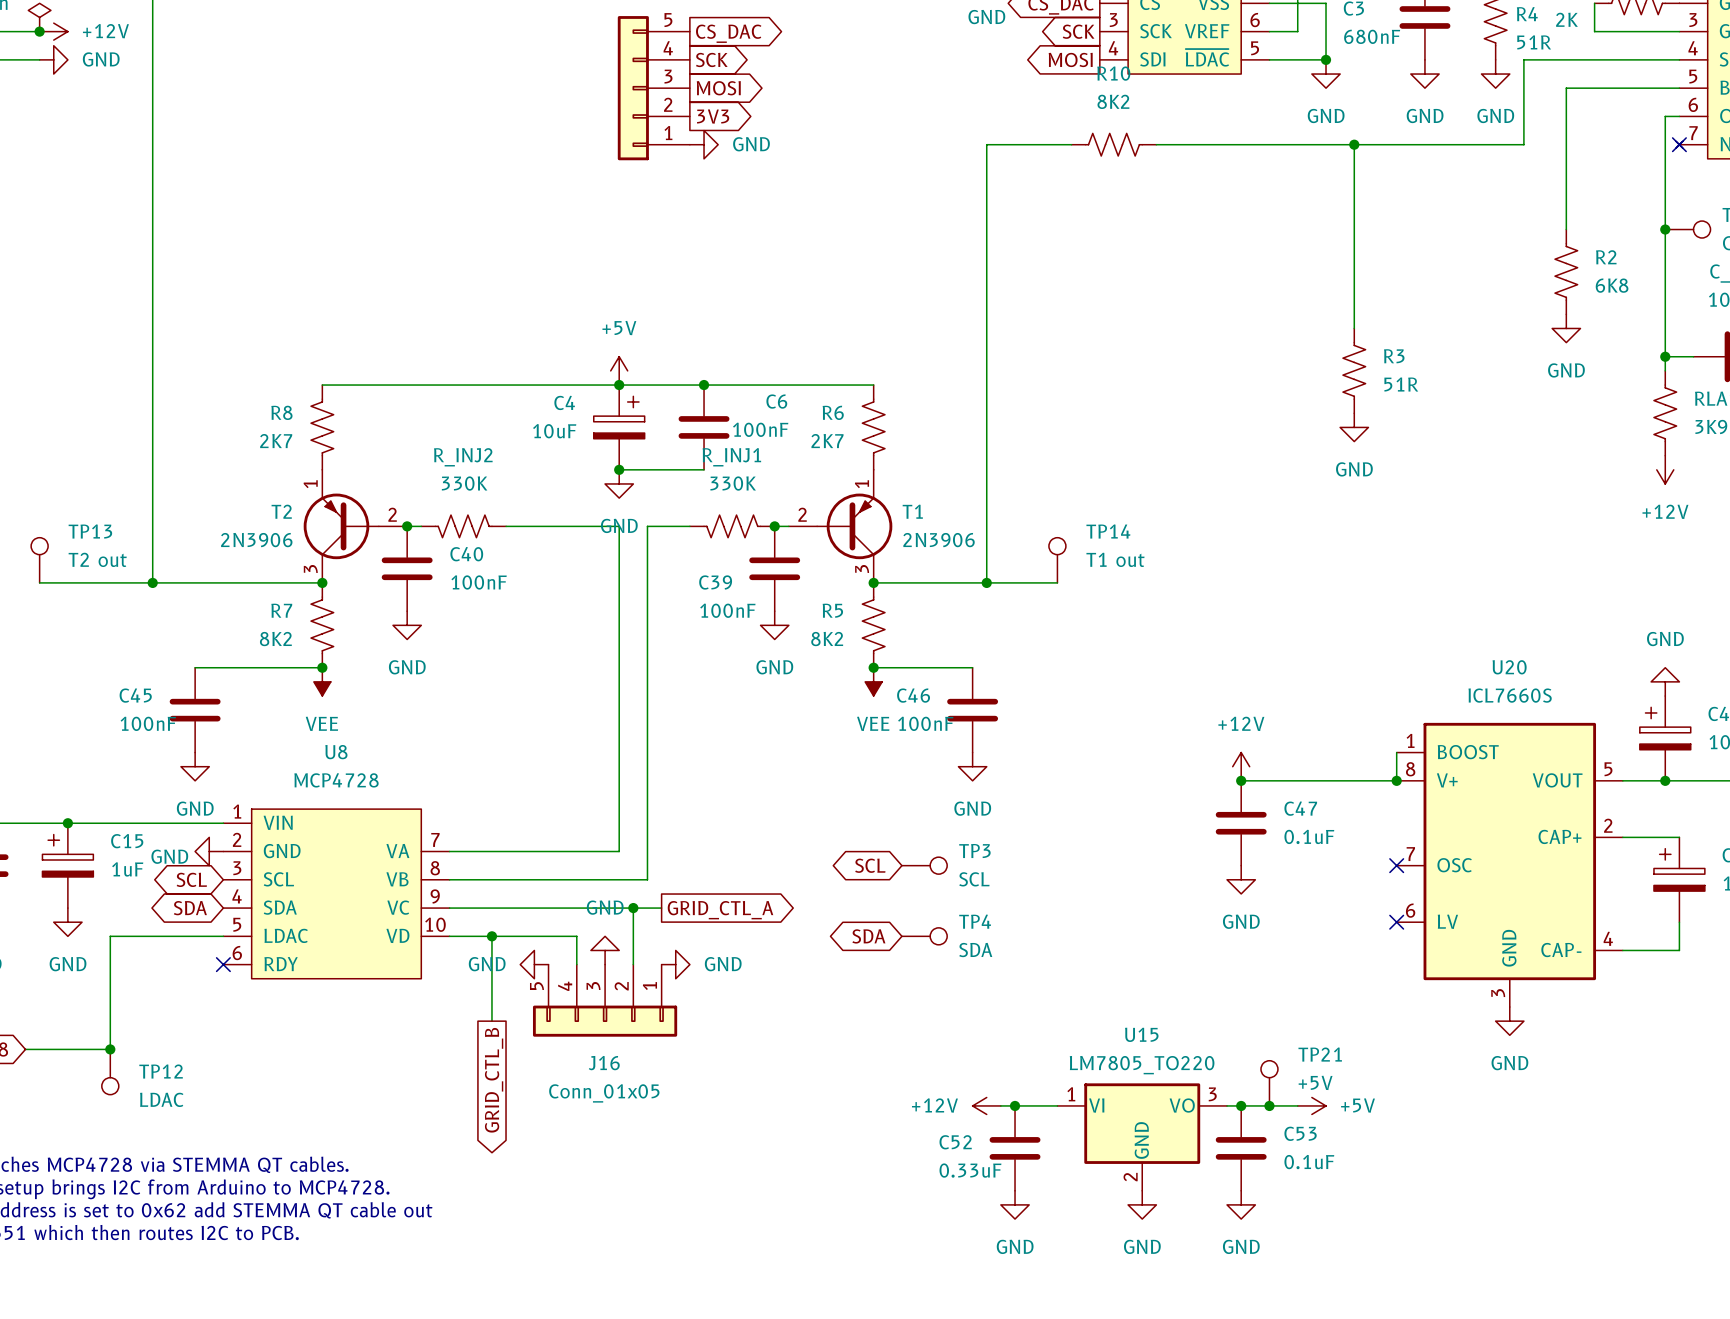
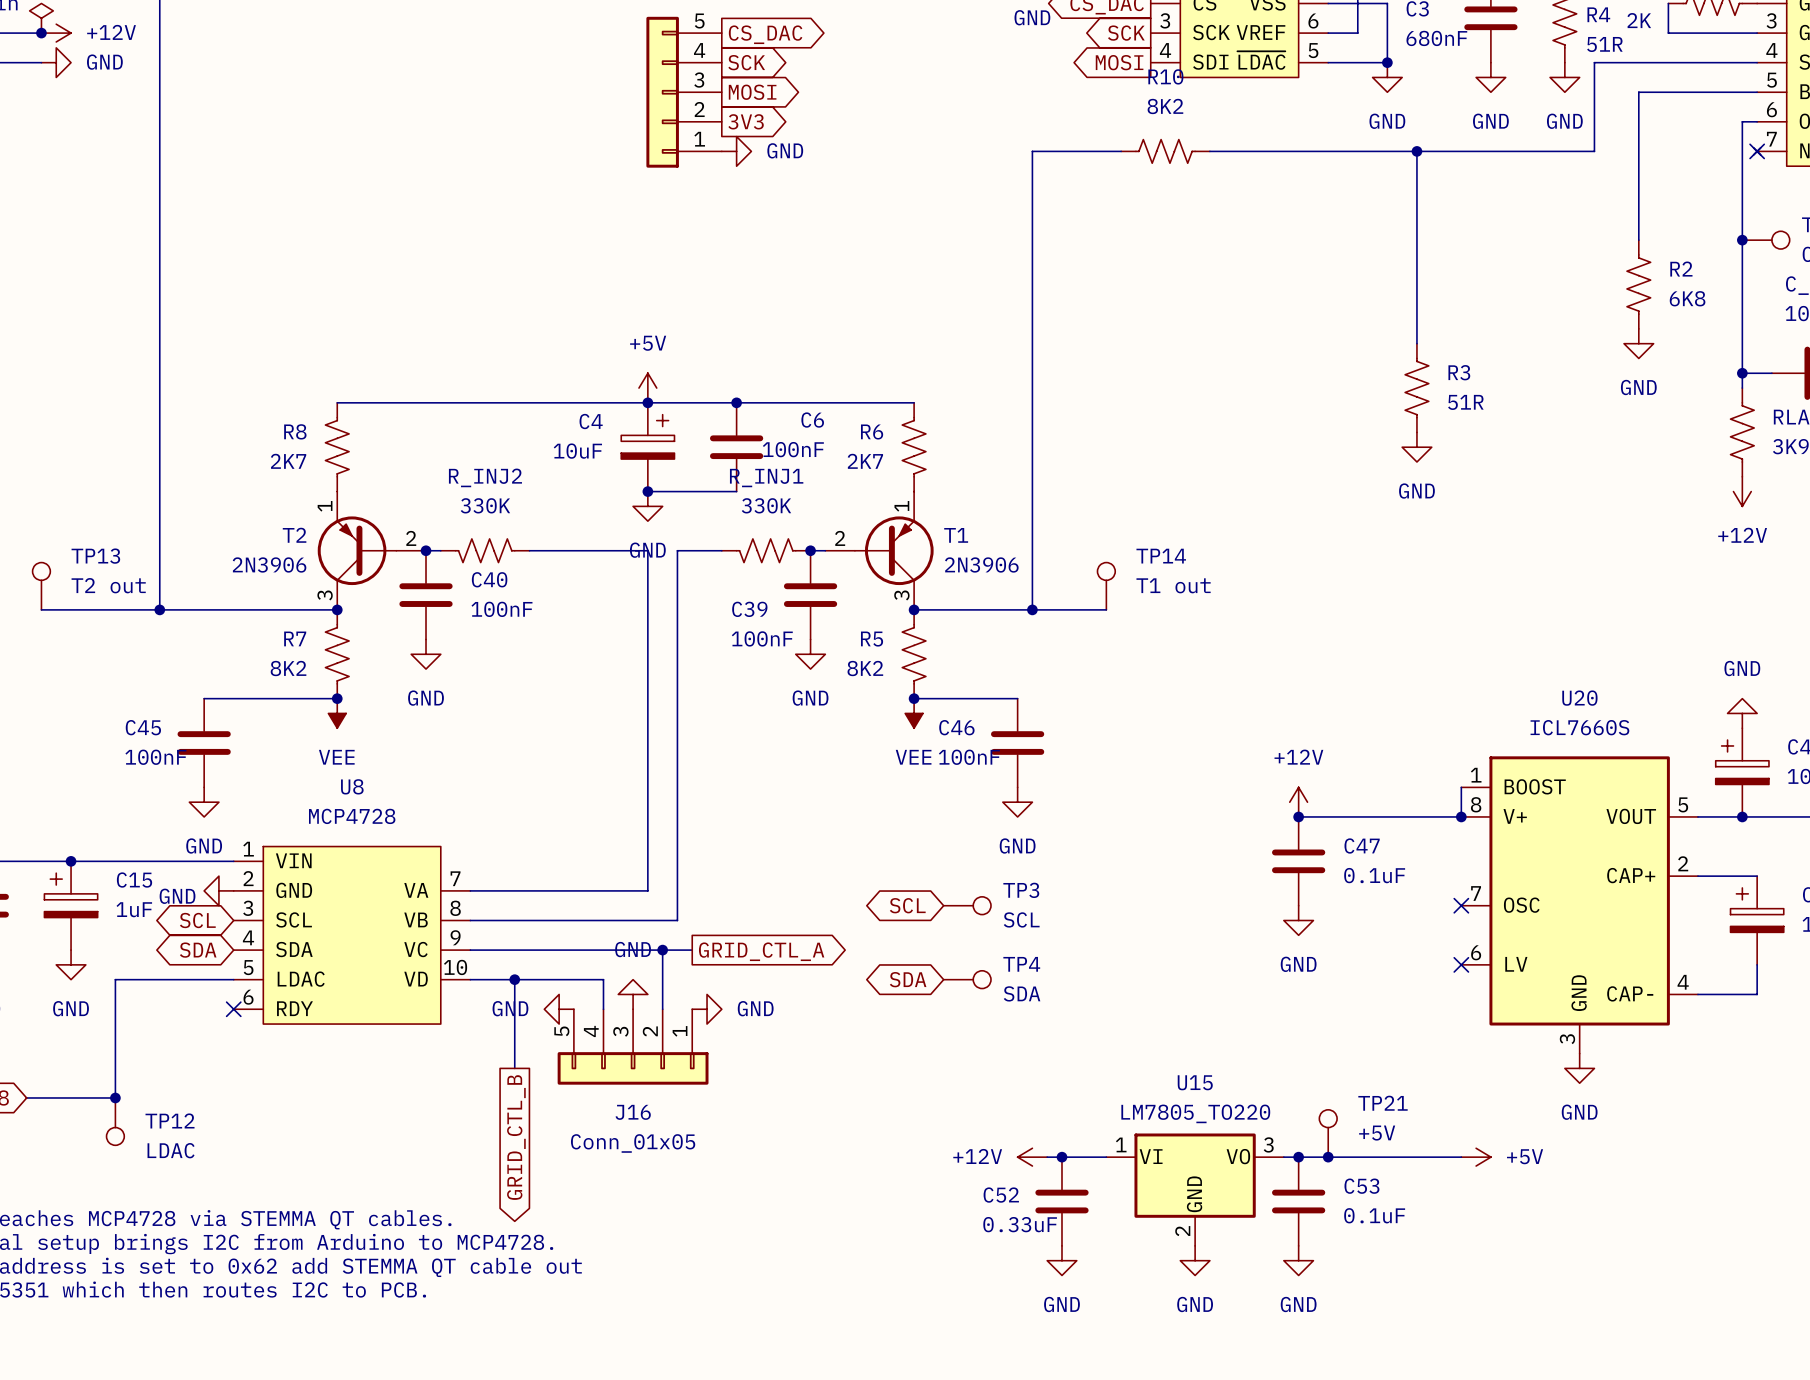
wire: none -> (1357, 1157) (1461, 1157)
power symbol position: +5V (1311, 1105) -> +5V (1476, 1157)

